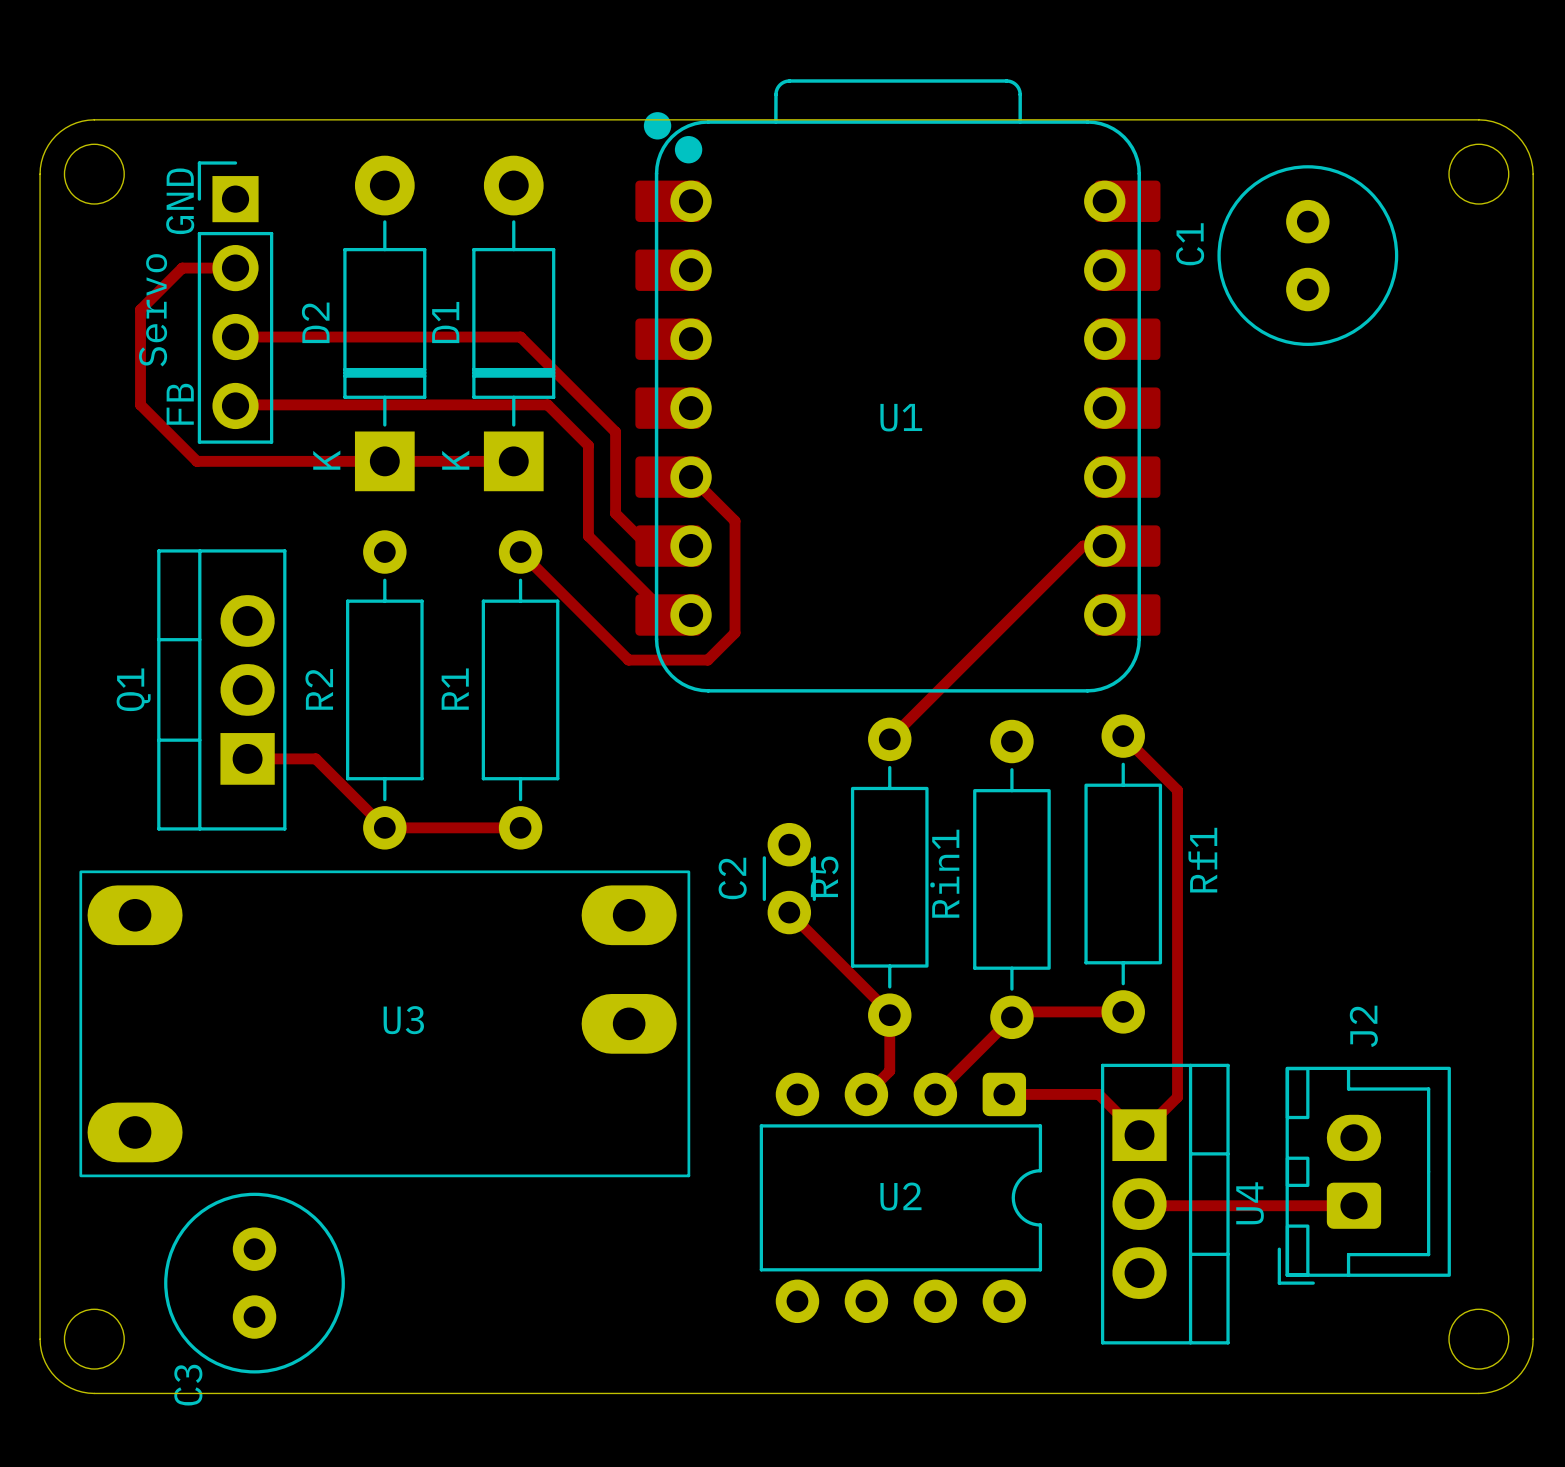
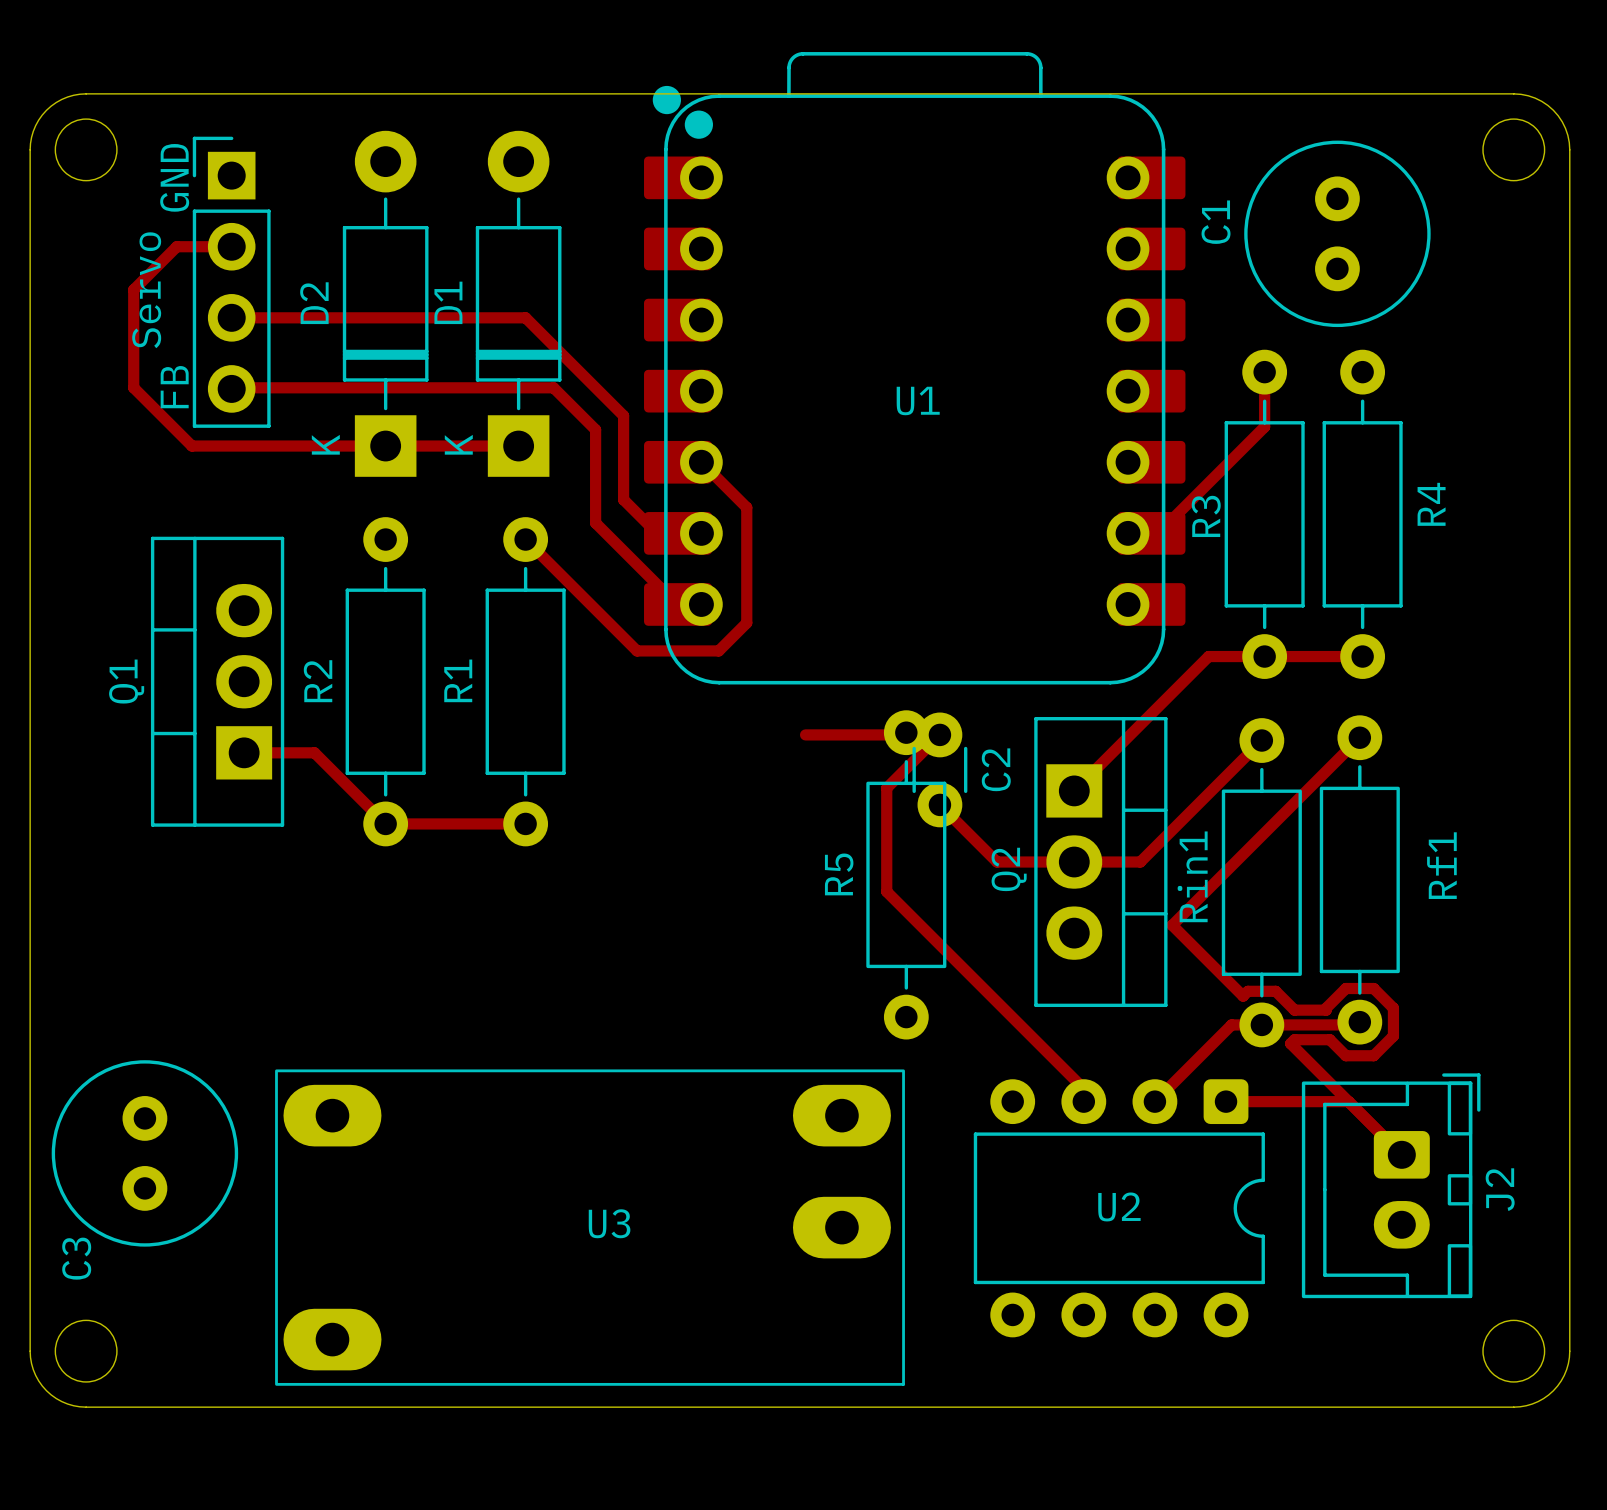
track: none -> (1264, 372) (1264, 426) (1158, 533)
R3: none -> (1264, 514)
R4: none -> (1362, 514)
track: (1104, 546) (1083, 546) (889, 739) -> none
track: none -> (1362, 656) (1208, 656) (1074, 790)
track: (1123, 736) (1177, 790) (1177, 1097) (1139, 1135) (1098, 1094) (1004, 1094) -> none
track: none -> (805, 734) (939, 734) (886, 788) (886, 891) (1083, 1088) (1083, 1101)
track: none -> (1359, 737) (1172, 925) (1243, 996) (1247, 991) (1275, 991) (1294, 1010) (1326, 1010) (1345, 988) (1373, 988) (1393, 1008) (1393, 1036) (1373, 1055) (1345, 1055) (1329, 1039) (1294, 1039) (1290, 1043) (1401, 1154)
track: none -> (1261, 740) (1140, 862) (997, 862) (939, 804)
Q2: none -> (1100, 862)
Rf1 position: (1123, 874) -> (1359, 879)
C2 name position: C2 (732, 878) -> C2 (996, 769)
C2 position: (789, 878) -> (939, 769)
Rin1 position: (1011, 879) -> (1261, 882)
track: (789, 912) (889, 1012) (889, 1071) (866, 1094) (866, 1086) -> none
track: (1123, 1011) (1017, 1011) (1011, 1017) -> none
track: (1011, 1017) (935, 1094) -> none
track: none -> (1359, 1022) (1357, 1024) (1231, 1024) (1154, 1101)
U3 position: (384, 1023) -> (590, 1227)
J2 name position: J2 (1363, 1026) -> J2 (1500, 1189)
track: none -> (1226, 1101) (1348, 1101)
J2 rotation: 0° (1364, 1175) -> 180° (1391, 1185)
U2 position: (900, 1197) -> (1119, 1208)
track: (1140, 1203) (1141, 1205) (1353, 1205) -> none
U4: (1165, 1204) -> none
C3 position: (254, 1283) -> (144, 1153)

